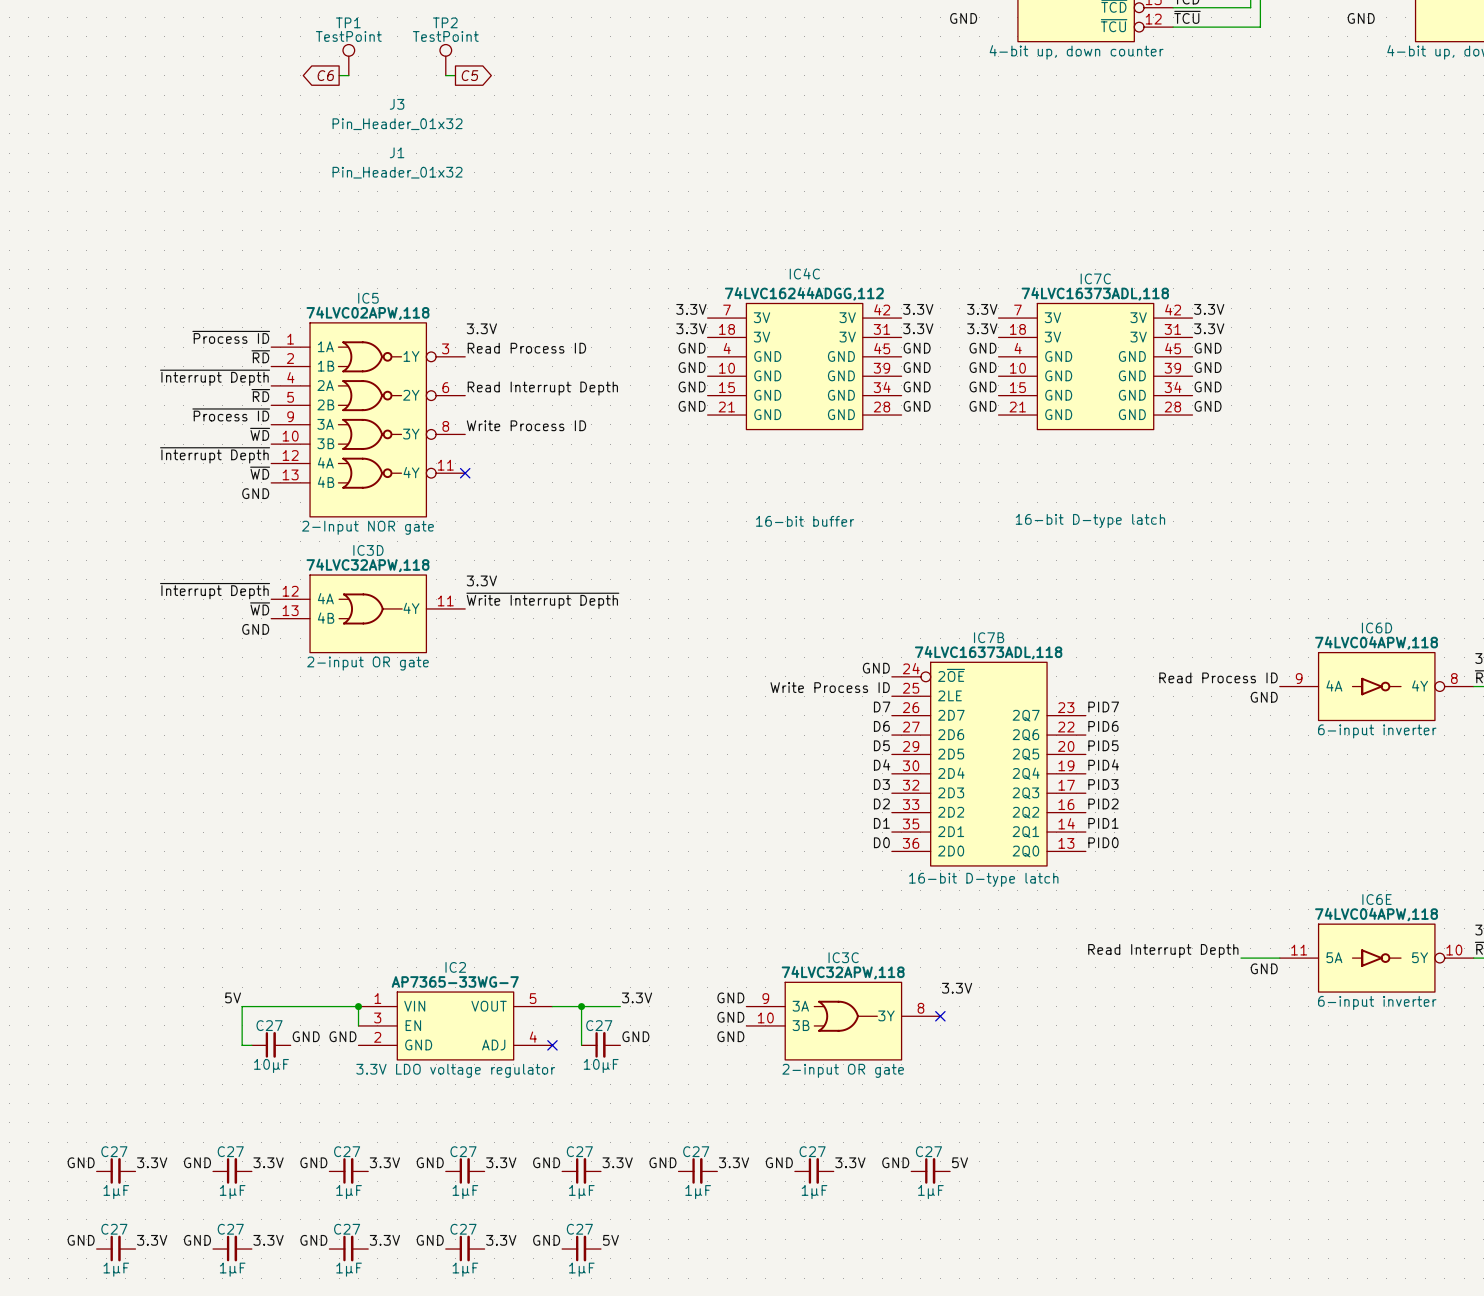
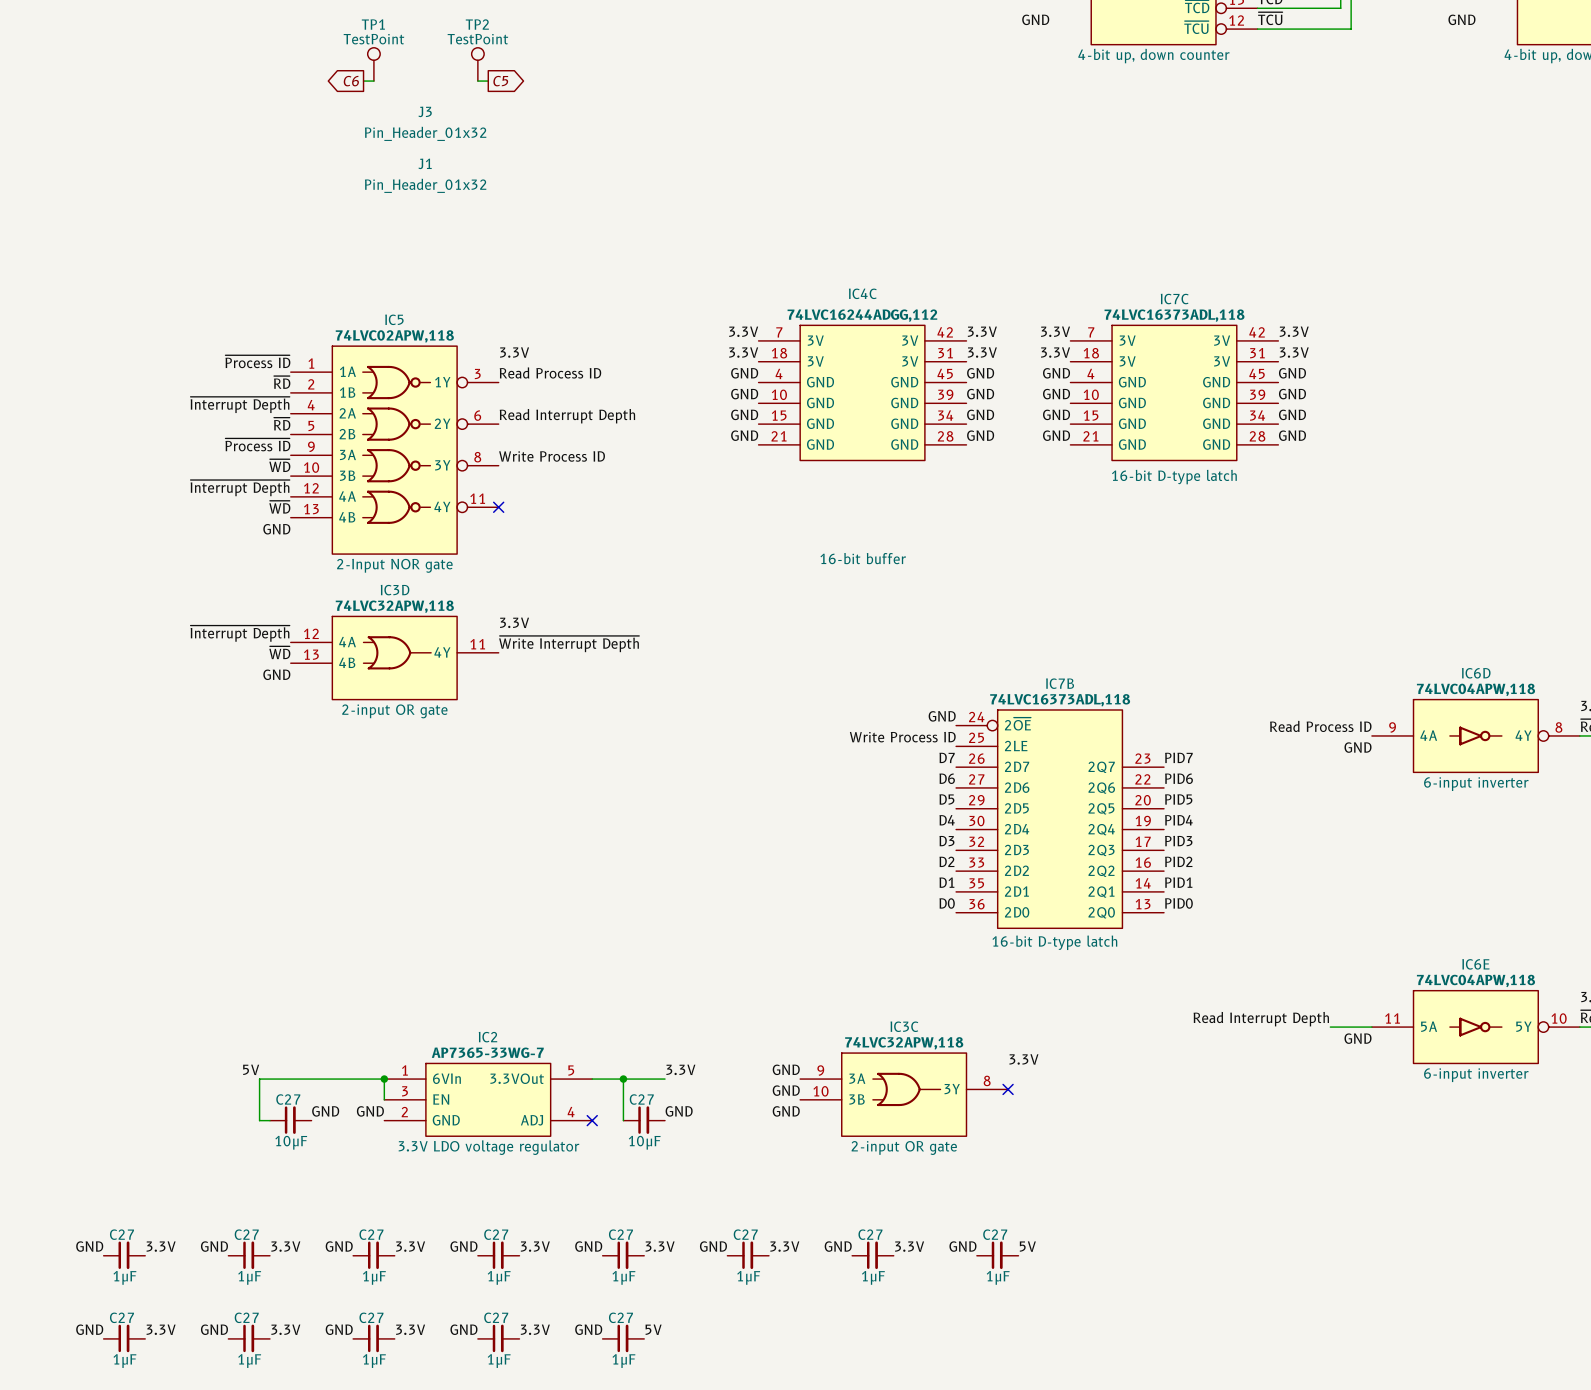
IC7C text position: 16-bit D-type latch (1090, 521) -> 16-bit D-type latch (1174, 477)
IC2 pin name: VIN (414, 1006) -> 6VIn (446, 1078)
IC2 pin name: VOUT (489, 1006) -> 3.3VOut (517, 1078)

